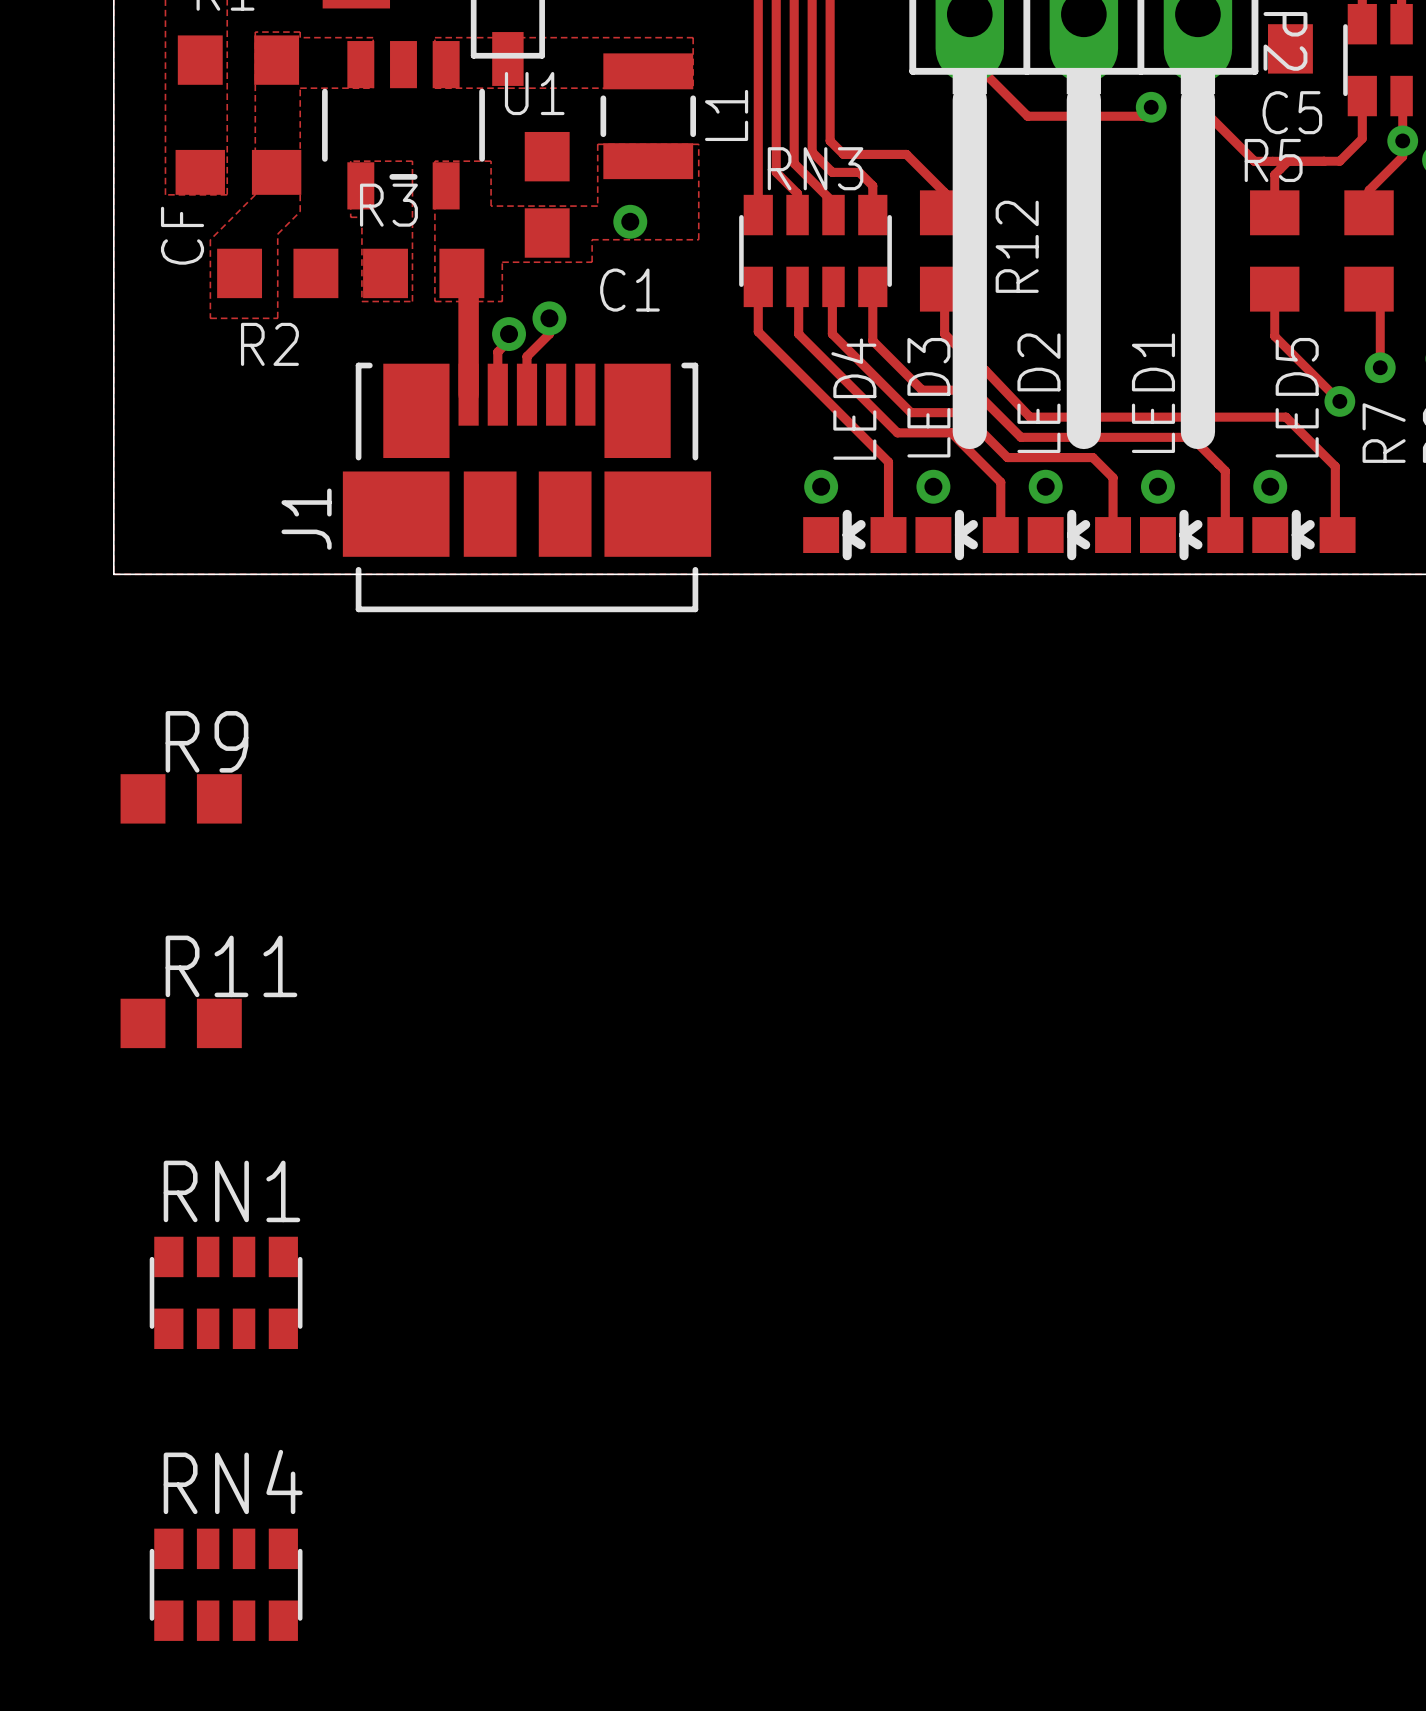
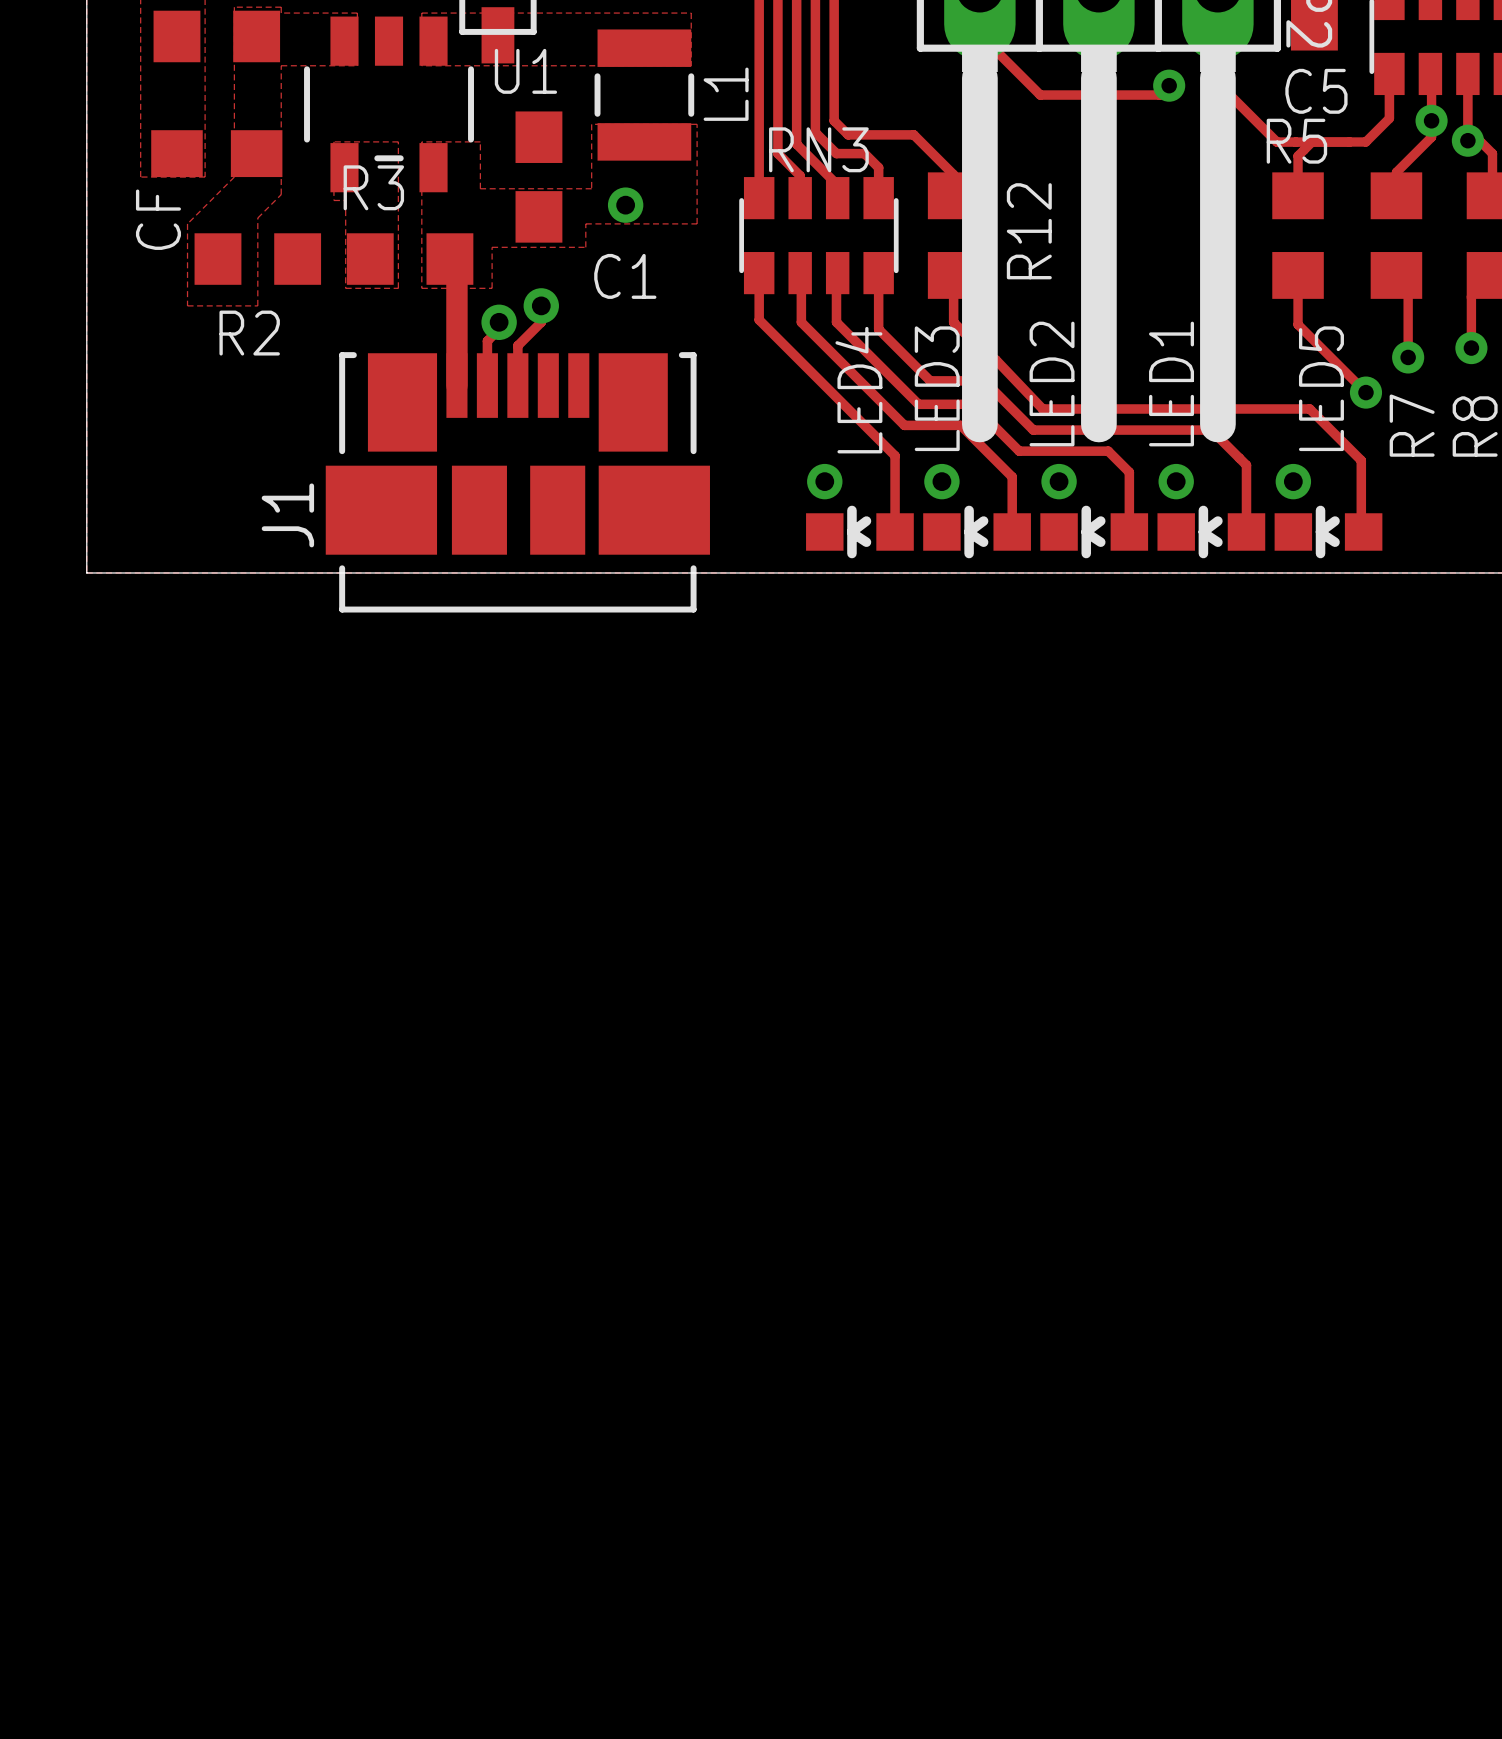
R9: (181, 798) -> none
R11: (181, 1023) -> none
RN1: (226, 1292) -> none
RN4: (226, 1584) -> none

